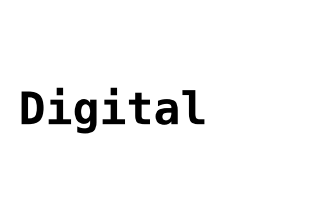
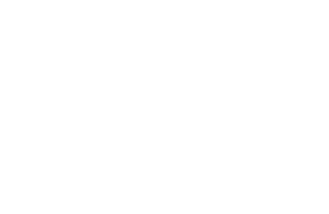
text: Digital (112, 110) -> none

